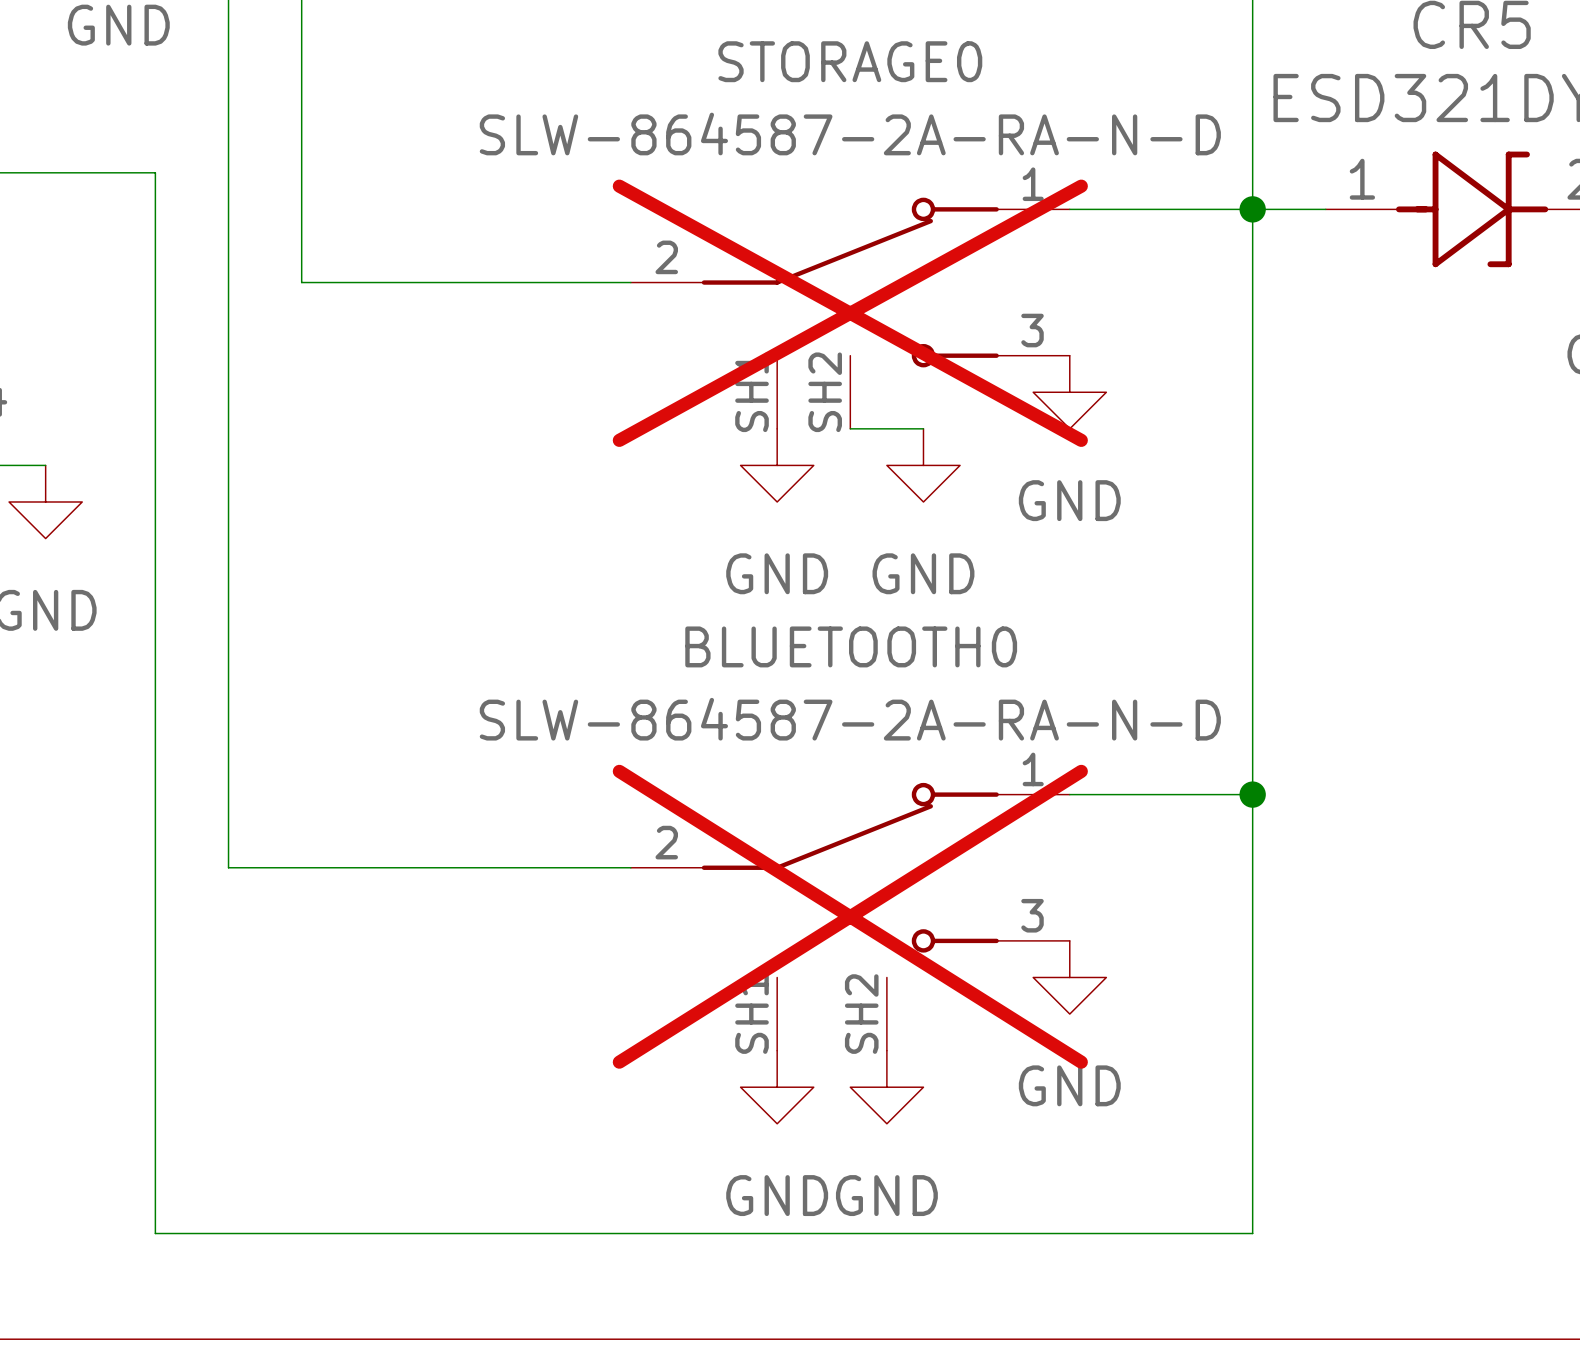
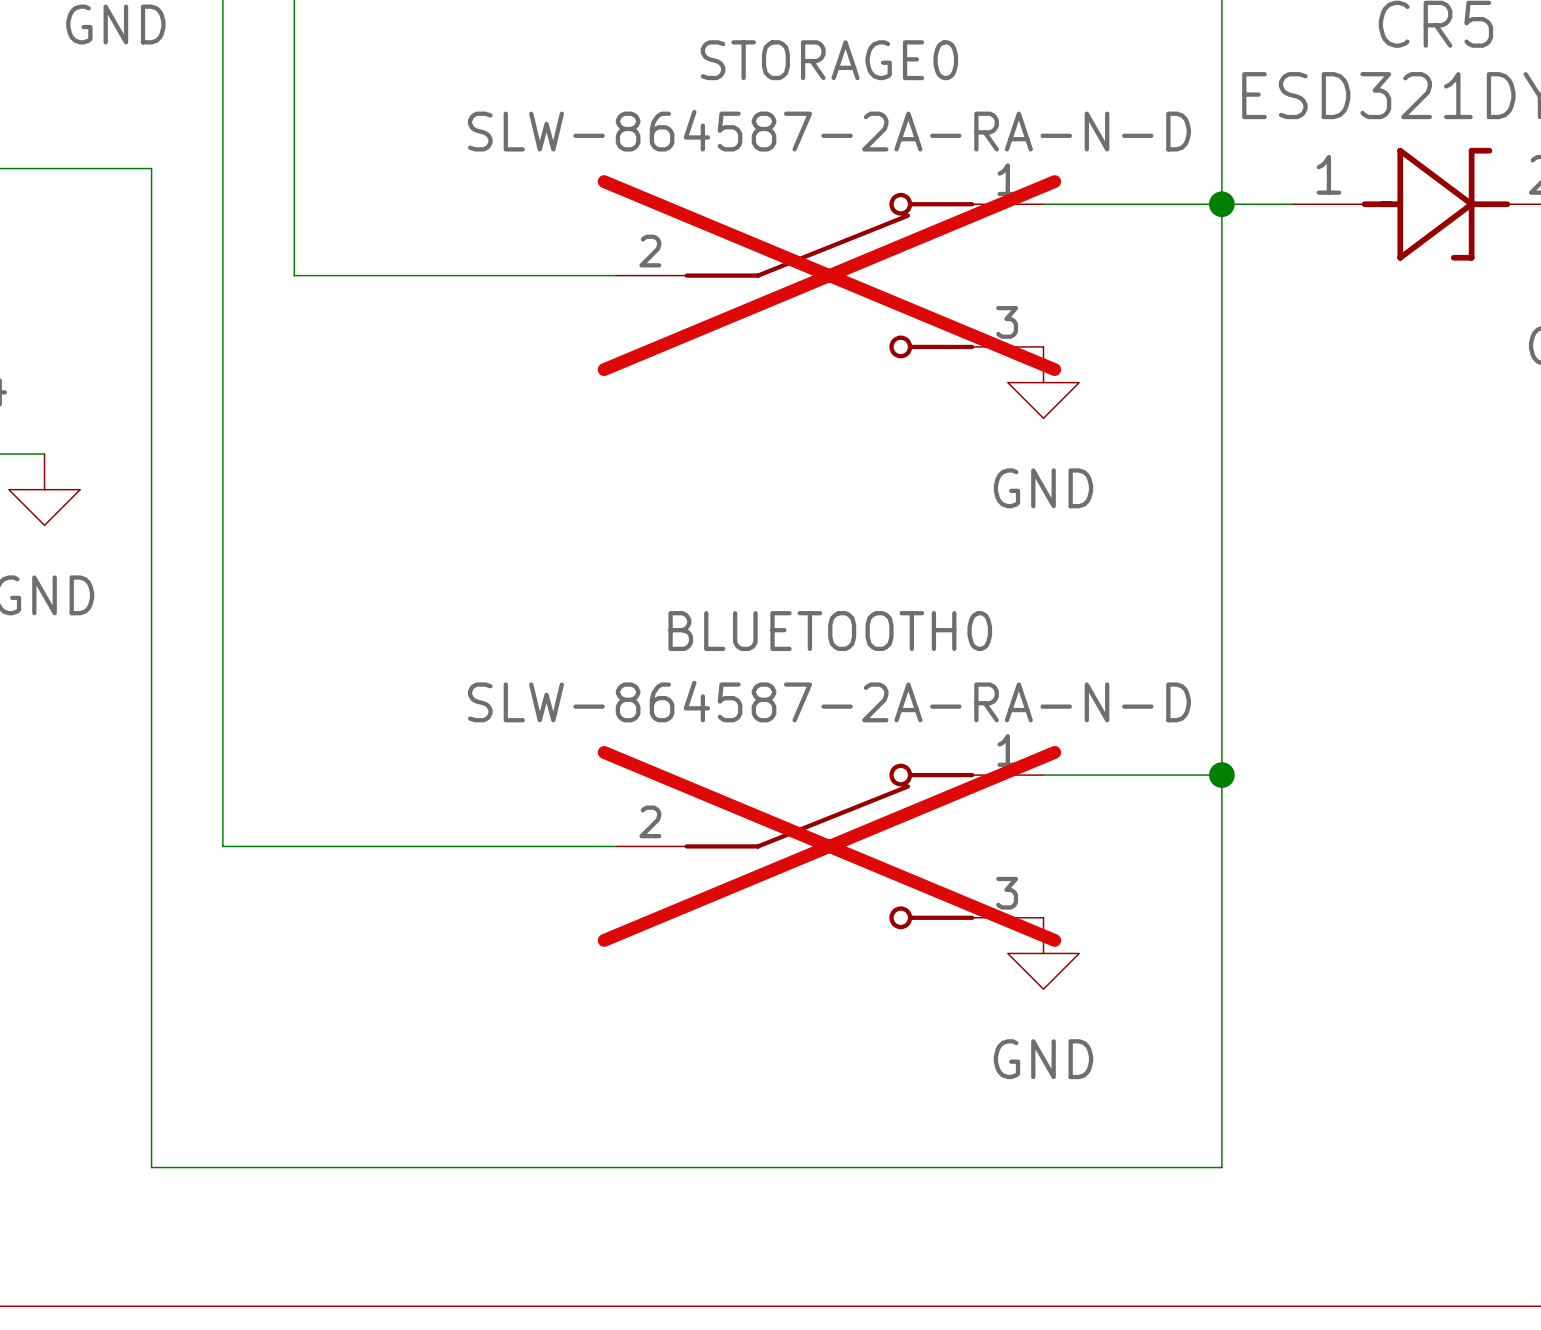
STORAGE0 symbol: [630, 197, 1070, 429] -> [615, 192, 1044, 359]
wire: (850, 428) (923, 428) -> none
power symbol: GND (777, 465) -> none
power symbol: GND (923, 465) -> none
BLUETOOTH0 symbol: [630, 782, 1070, 1051] -> [615, 763, 1044, 930]
power symbol: GND (777, 1087) -> none
power symbol: GND (886, 1087) -> none
wire: (155, 1196) (155, 1233) (1252, 1233) (1252, 1196) -> (151, 1167) (1221, 1167)

